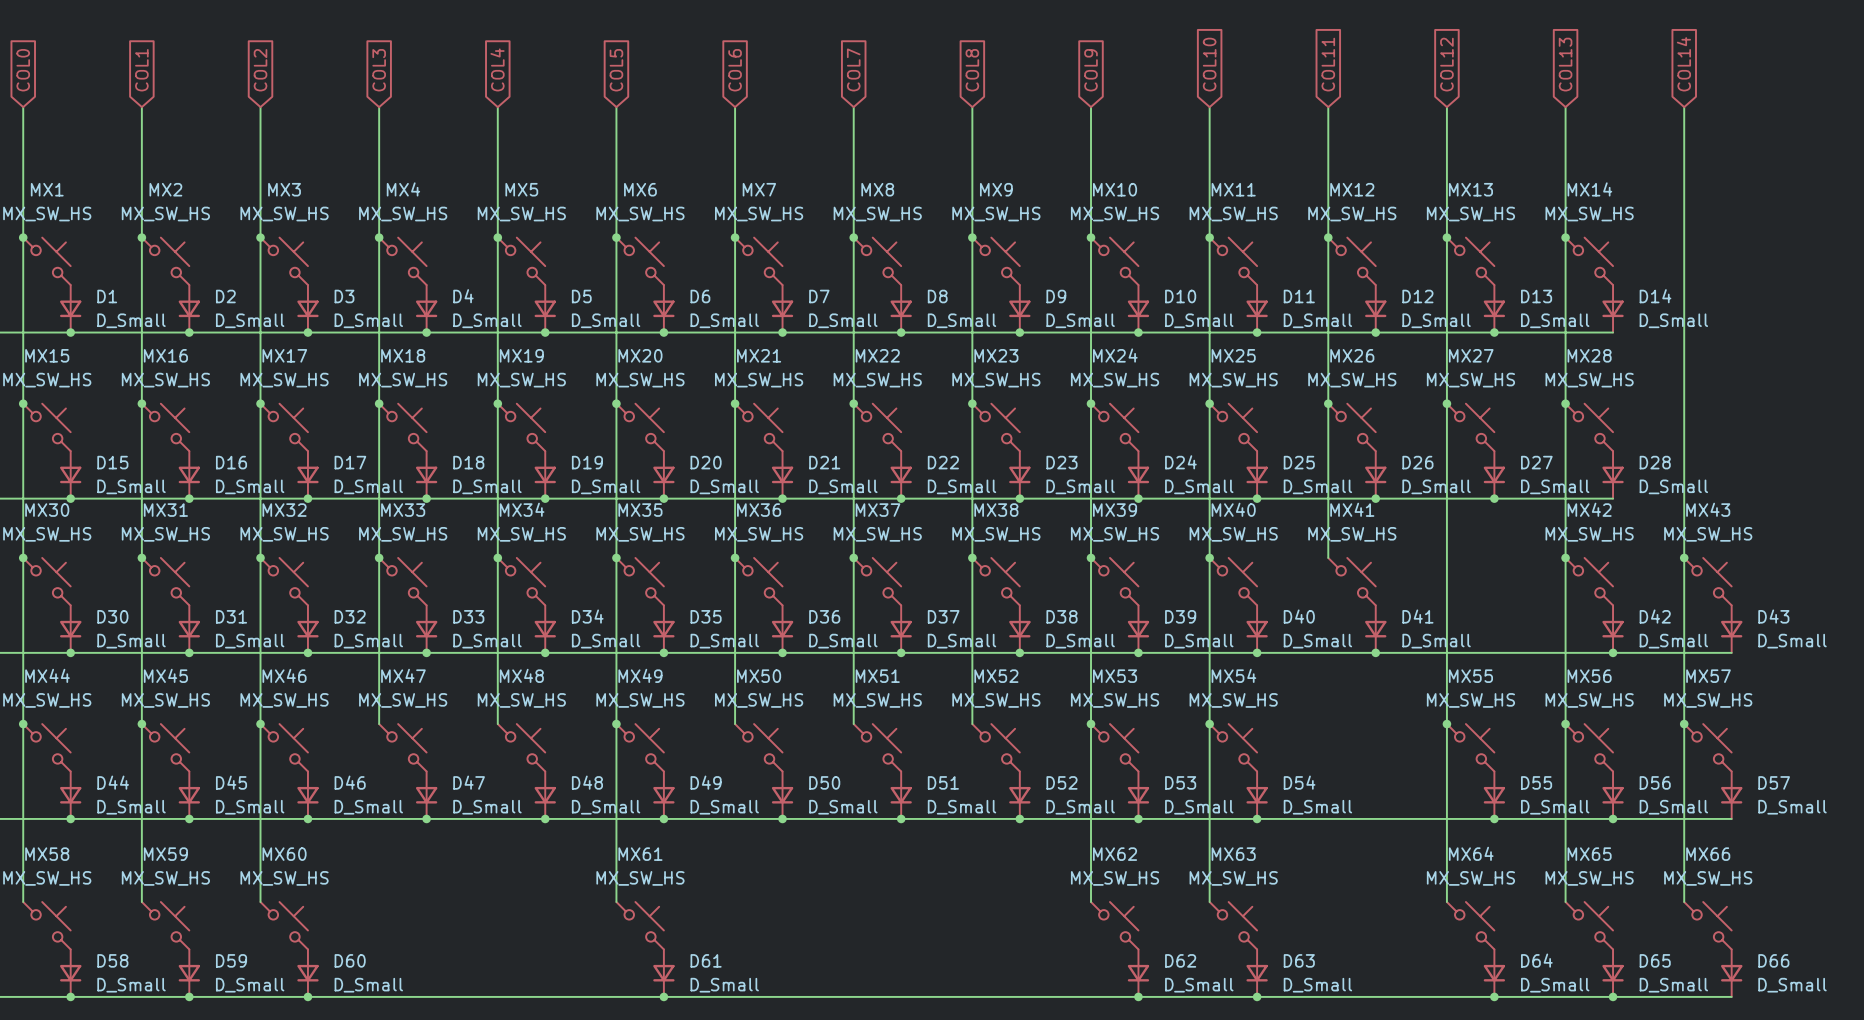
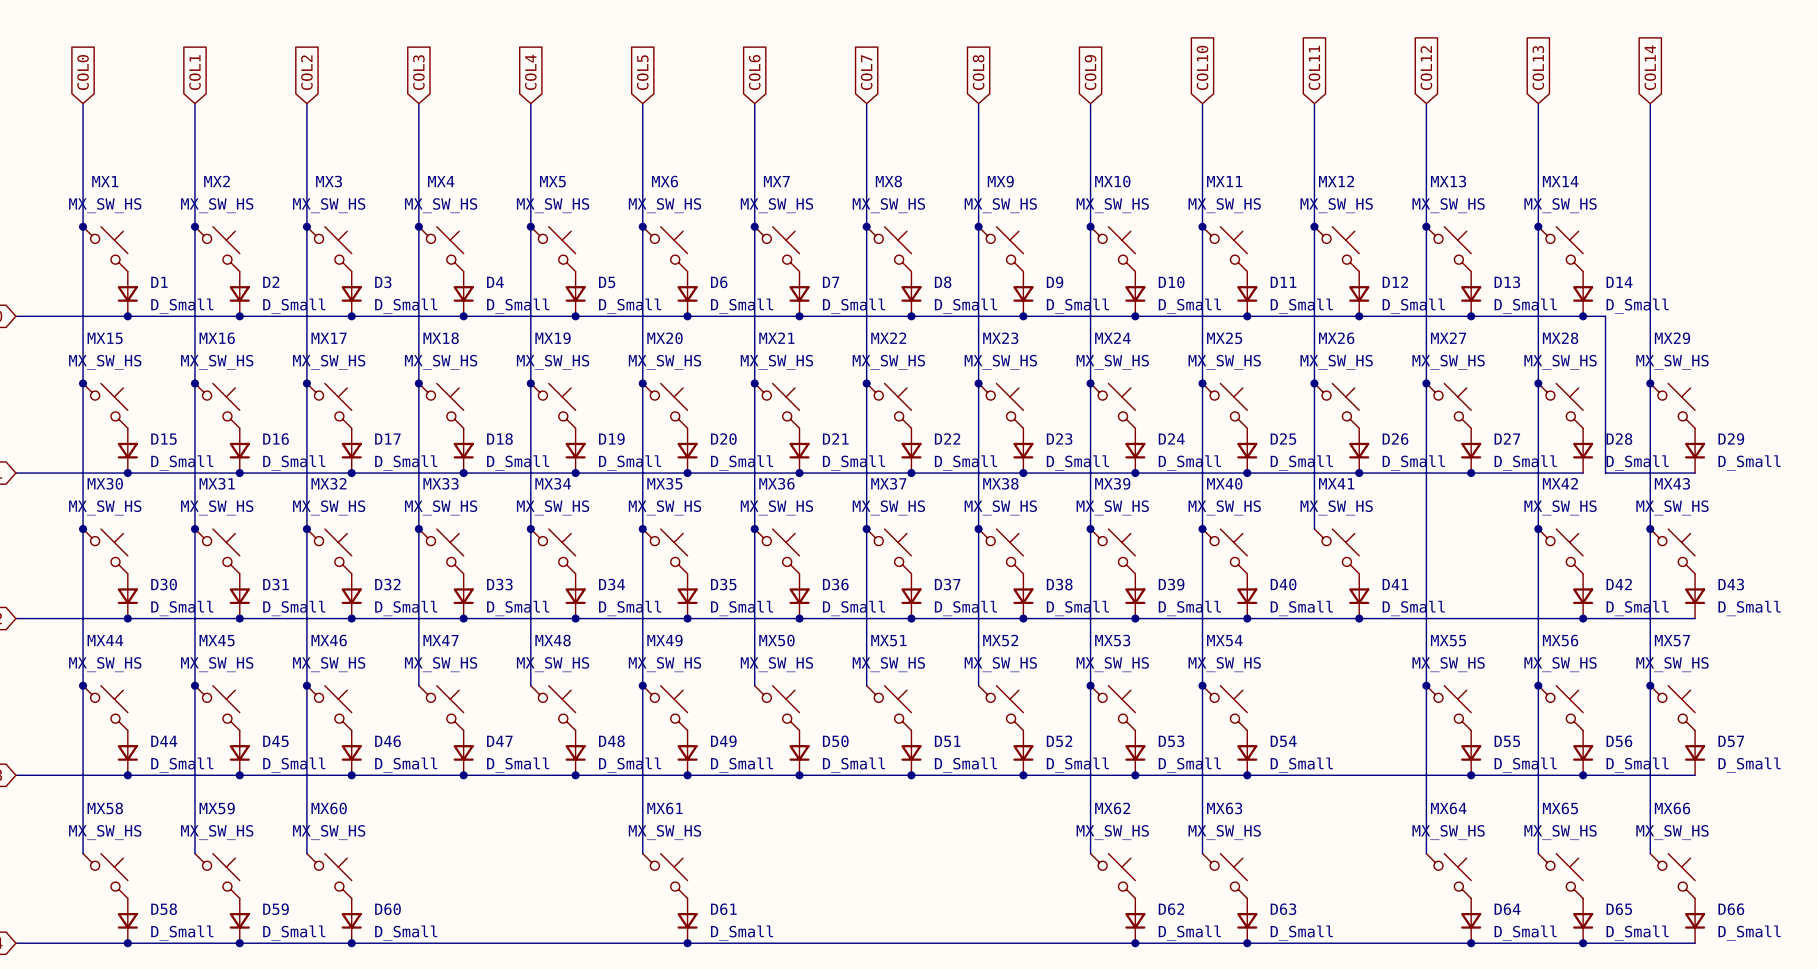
wire: none -> (1583, 316) (1605, 316) (1605, 473) (1695, 473)
junction: none -> (1583, 316)
junction: none -> (1650, 383)
MX29: none -> MX_SW_HS (1672, 405)
D29: none -> D_Small (1695, 450)

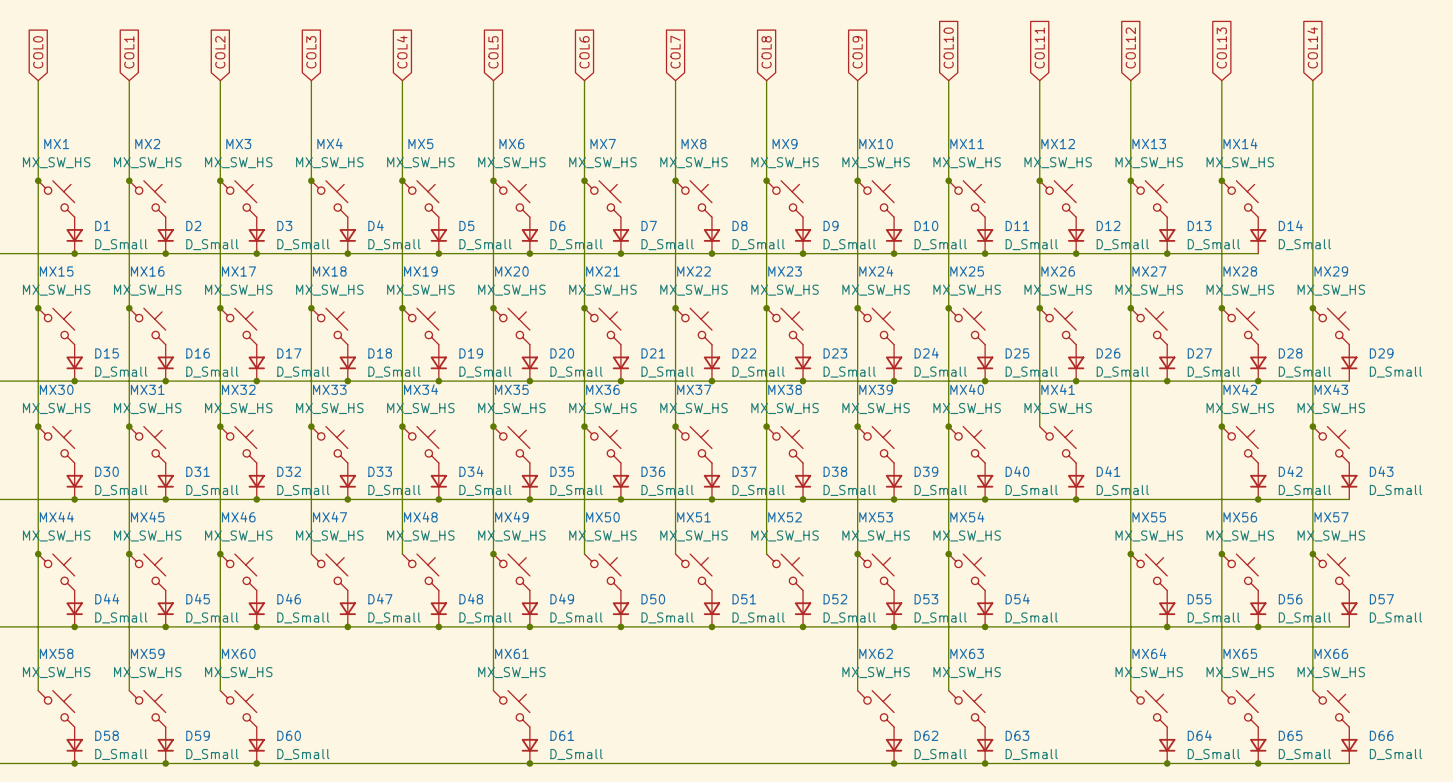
wire: (1583, 316) (1605, 316) (1605, 473) -> (1258, 381) (1276, 381)
junction: (1583, 316) -> none
junction: none -> (1258, 381)

